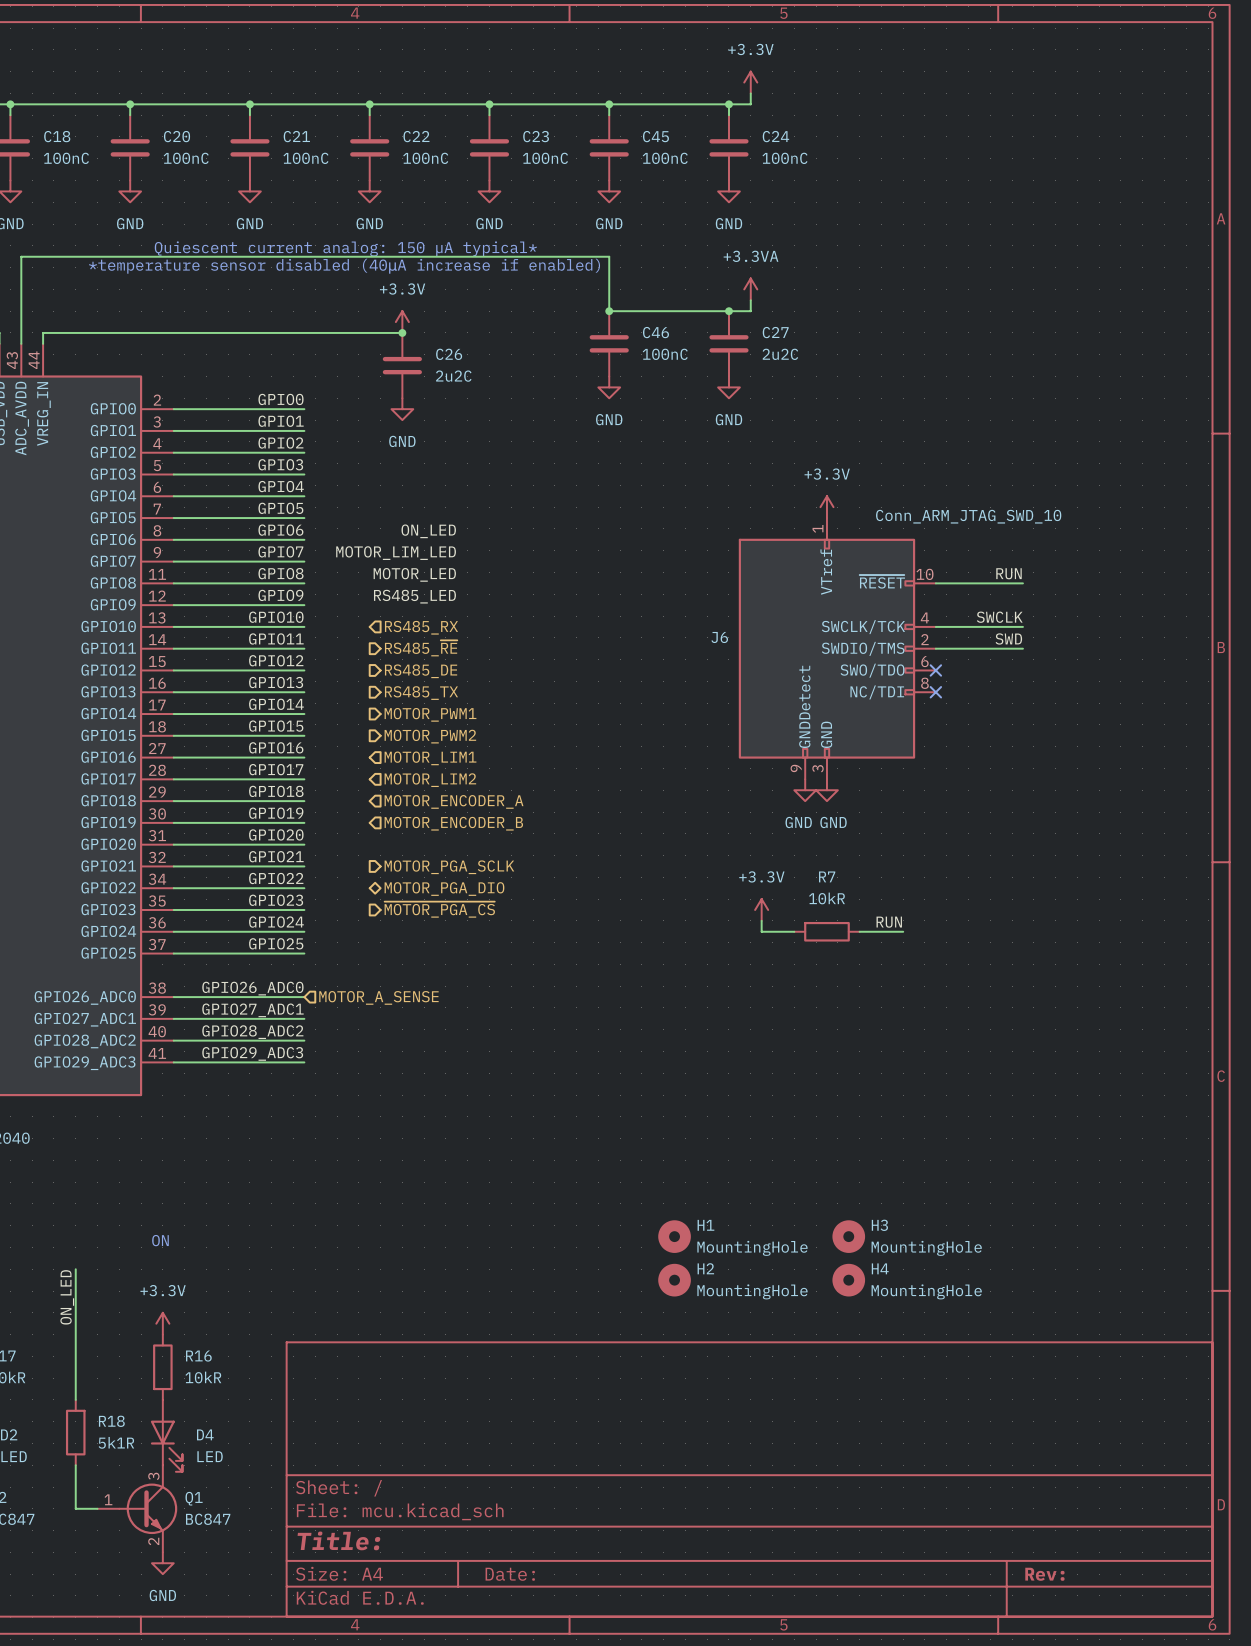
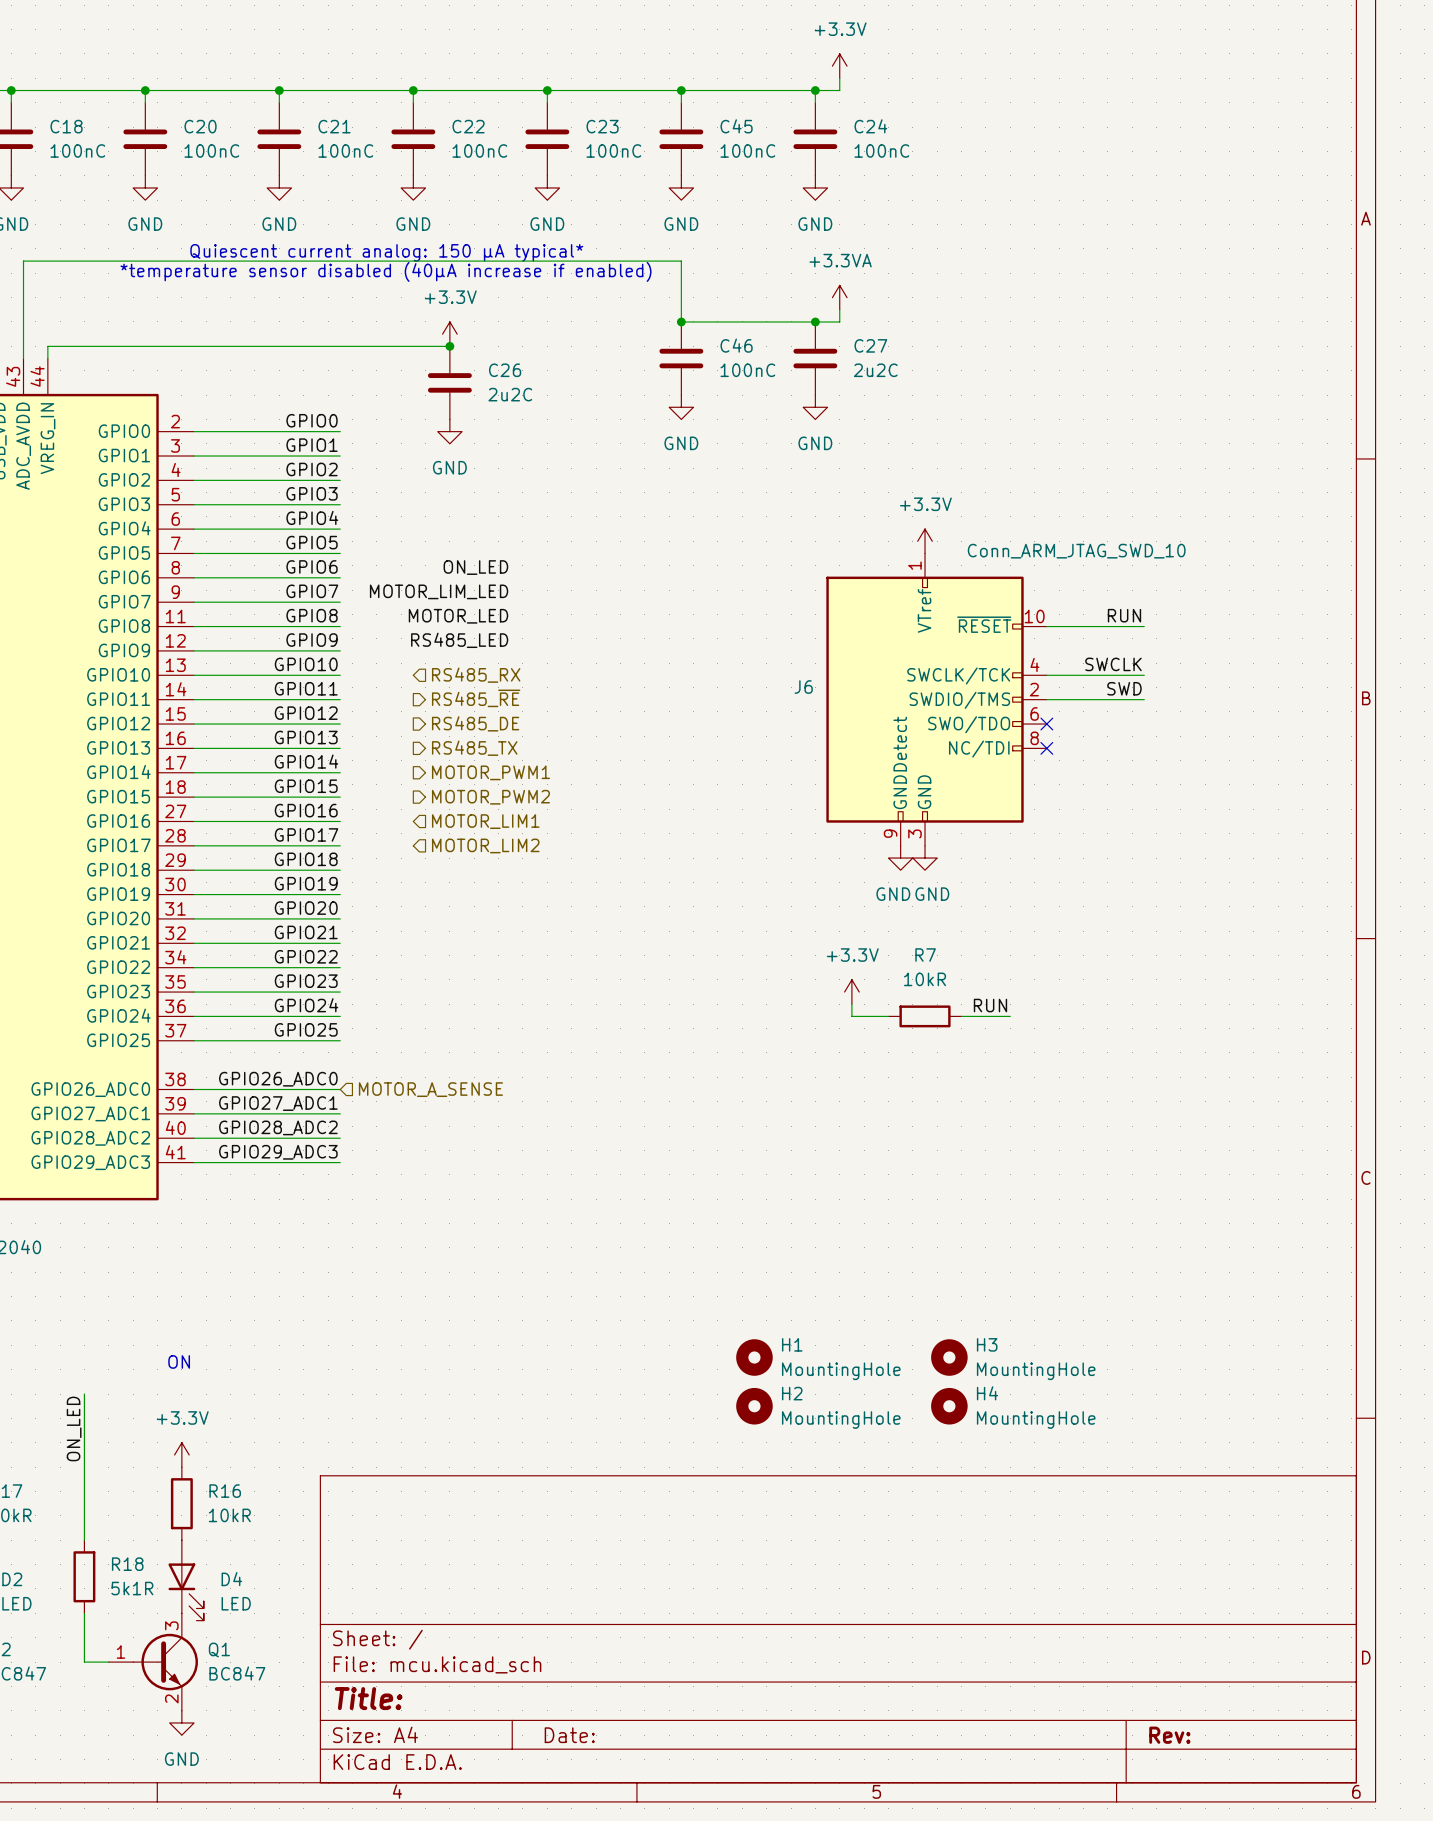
hierarchical label: MOTOR_ENCODER_A (454, 801) -> none
hierarchical label: MOTOR_ENCODER_B (453, 823) -> none
hierarchical label: MOTOR_PGA_SCLK (449, 867) -> none
hierarchical label: MOTOR_PGA_DIO (444, 889) -> none
hierarchical label: ~{MOTOR_PGA_CS} (439, 909) -> none

